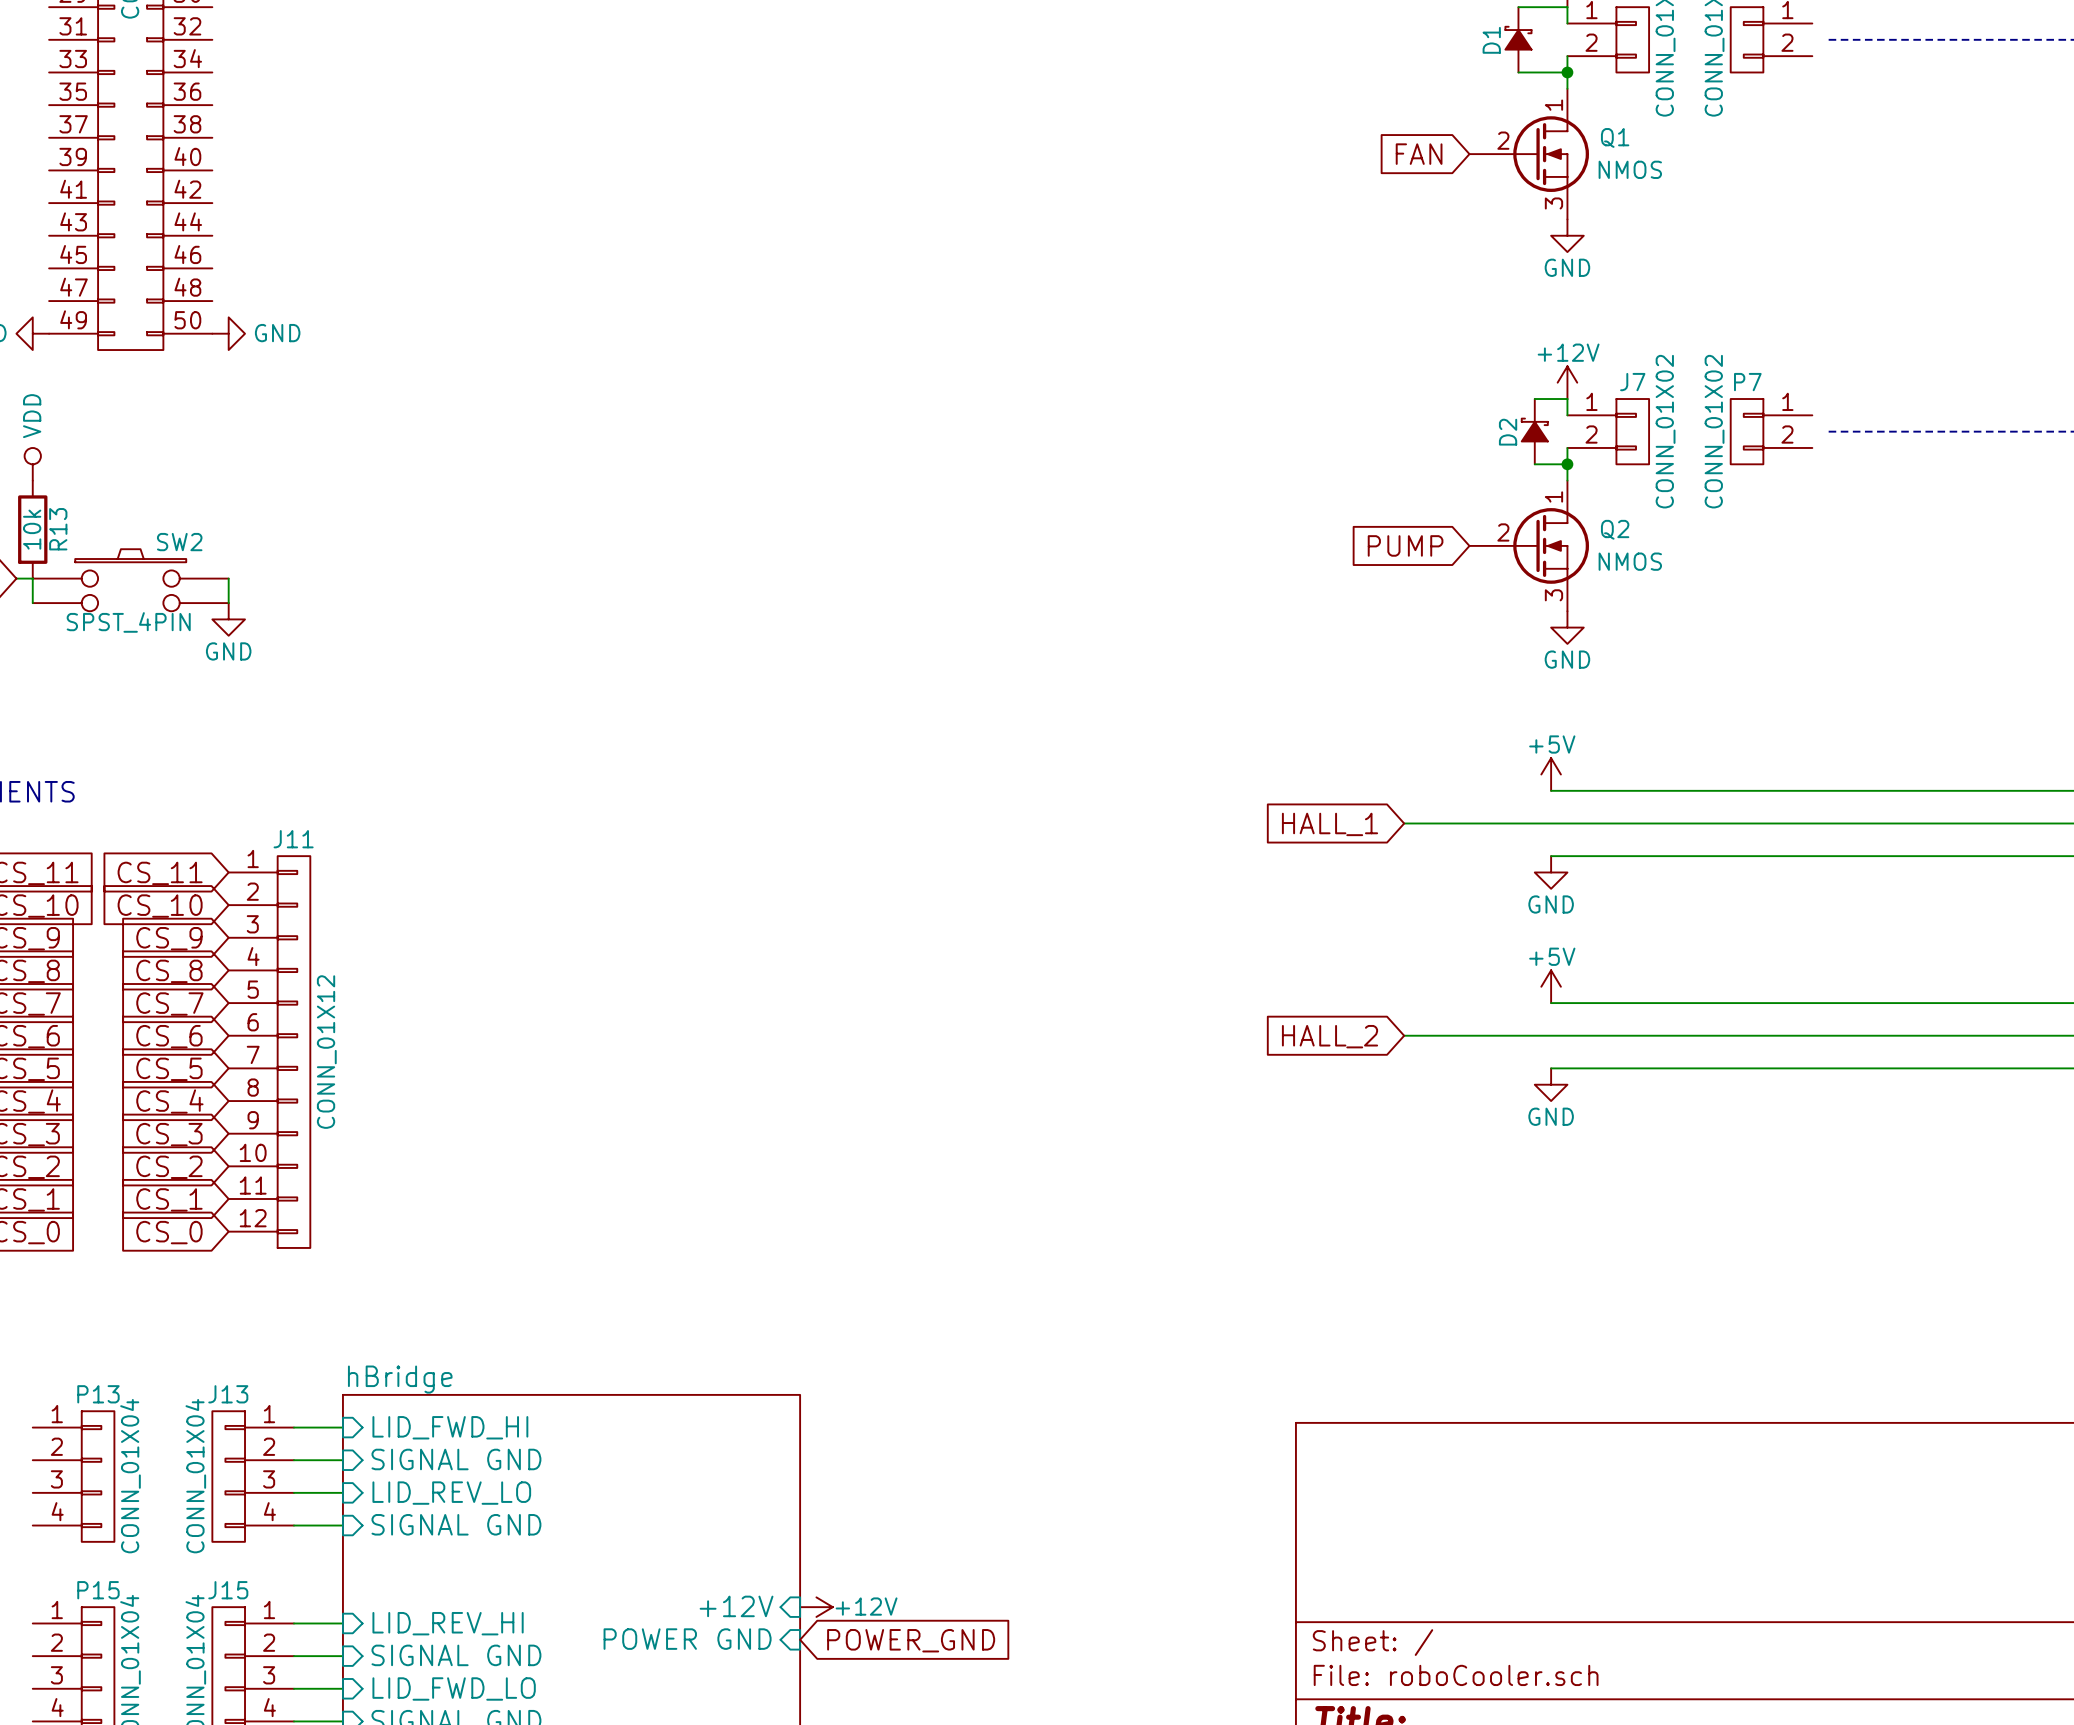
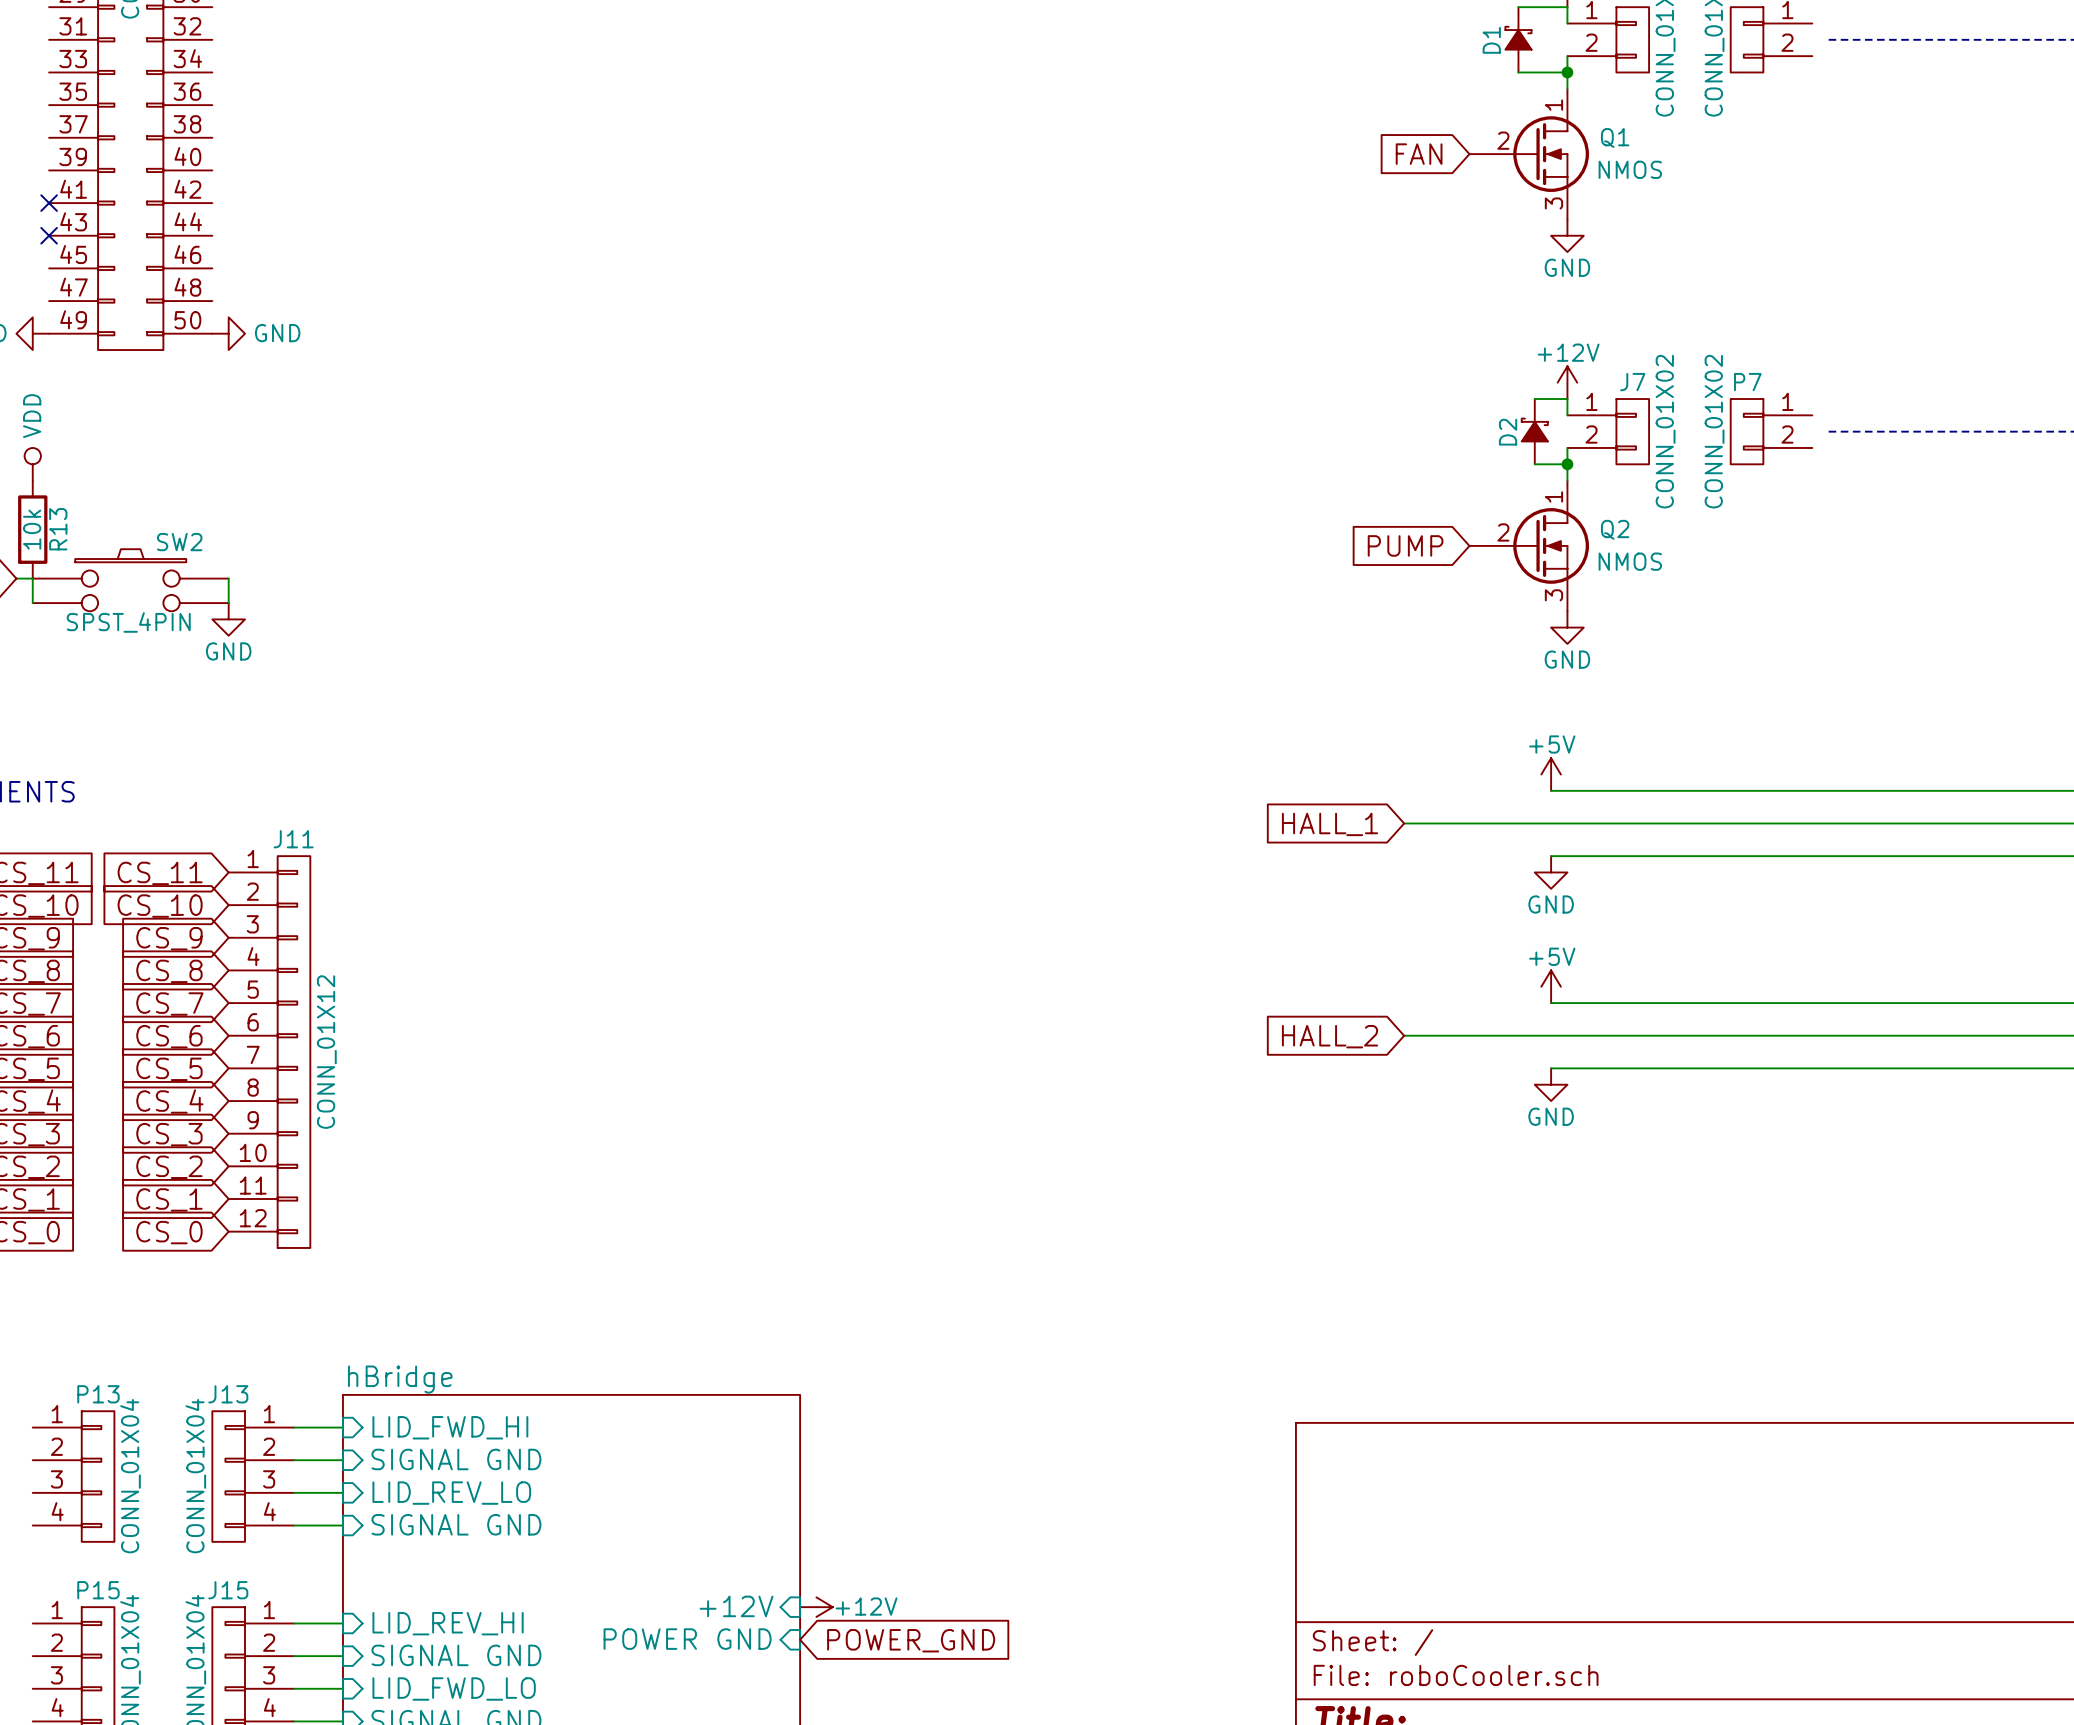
no-connect mark: none -> (49, 203)
no-connect mark: none -> (49, 235)

